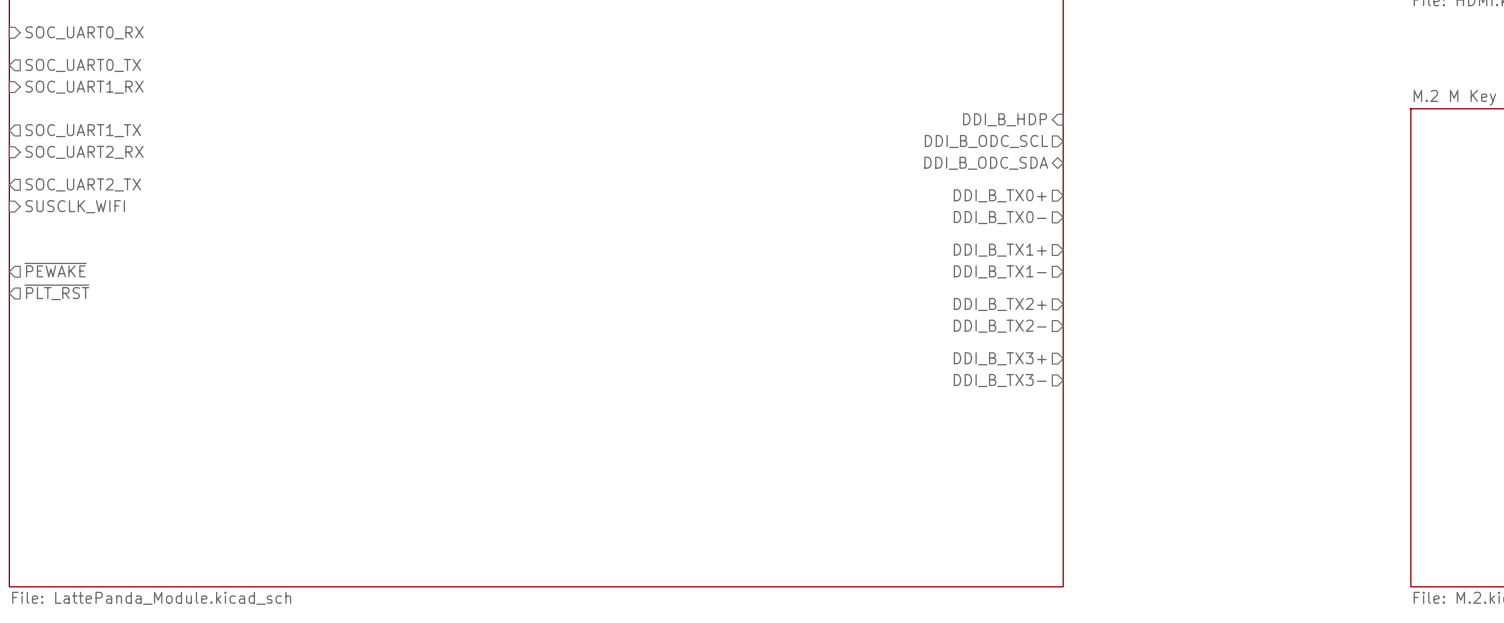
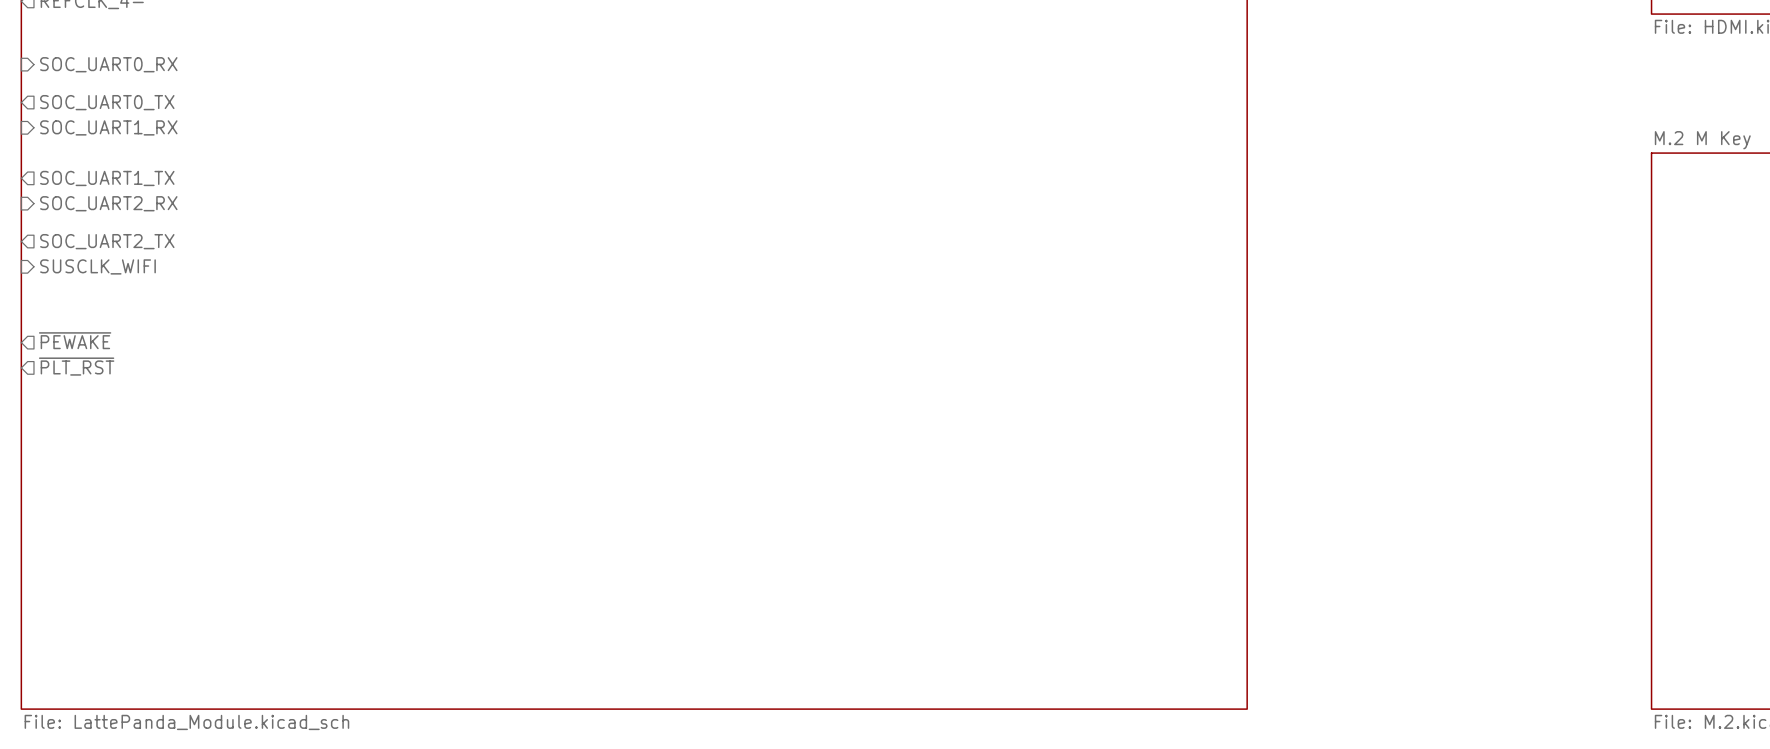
sheet pin: DDI_B_HDP (1005, 119) -> none
sheet pin: DDI_B_ODC_SCL (986, 141) -> none
sheet pin: DDI_B_ODC_SDA (986, 163) -> none
sheet pin: DDI_B_TX0+ (1000, 195) -> none
sheet pin: DDI_B_TX0- (1000, 217) -> none
sheet pin: DDI_B_TX1+ (1000, 250) -> none
sheet pin: DDI_B_TX1- (1000, 271) -> none
sheet pin: DDI_B_TX2+ (1000, 304) -> none
sheet pin: DDI_B_TX2- (1000, 326) -> none
sheet pin: DDI_B_TX3+ (1000, 358) -> none
sheet pin: DDI_B_TX3- (1000, 380) -> none

